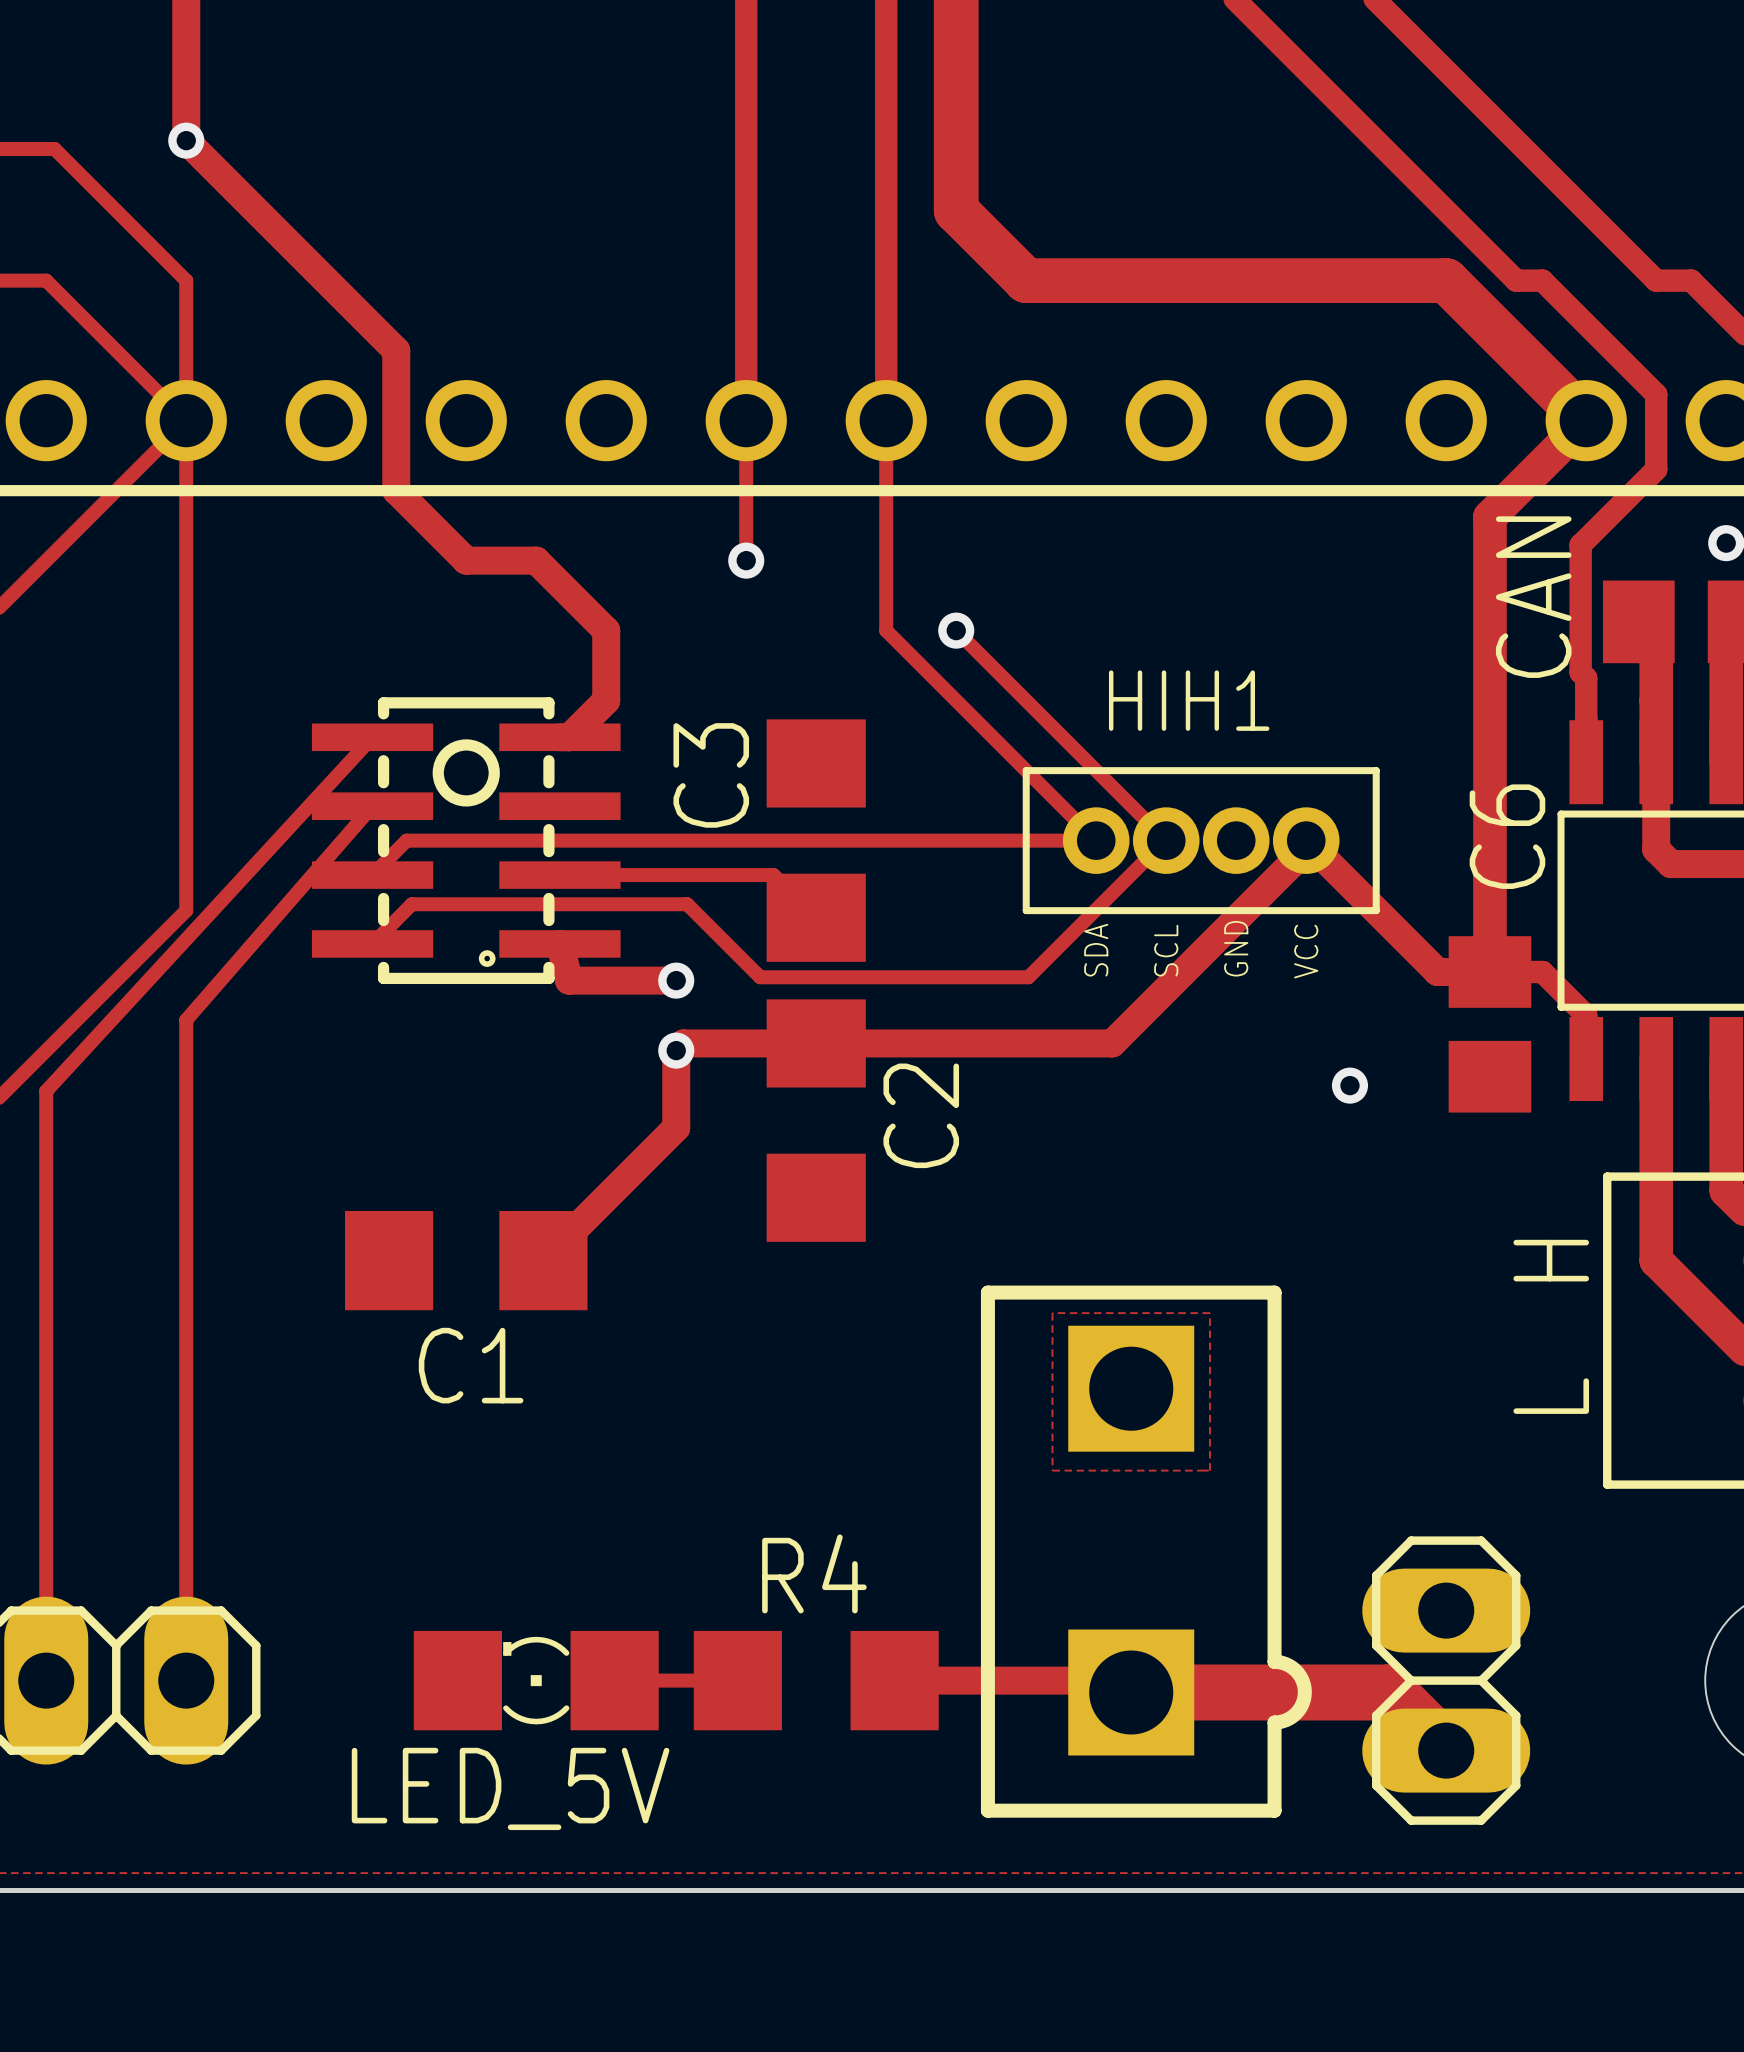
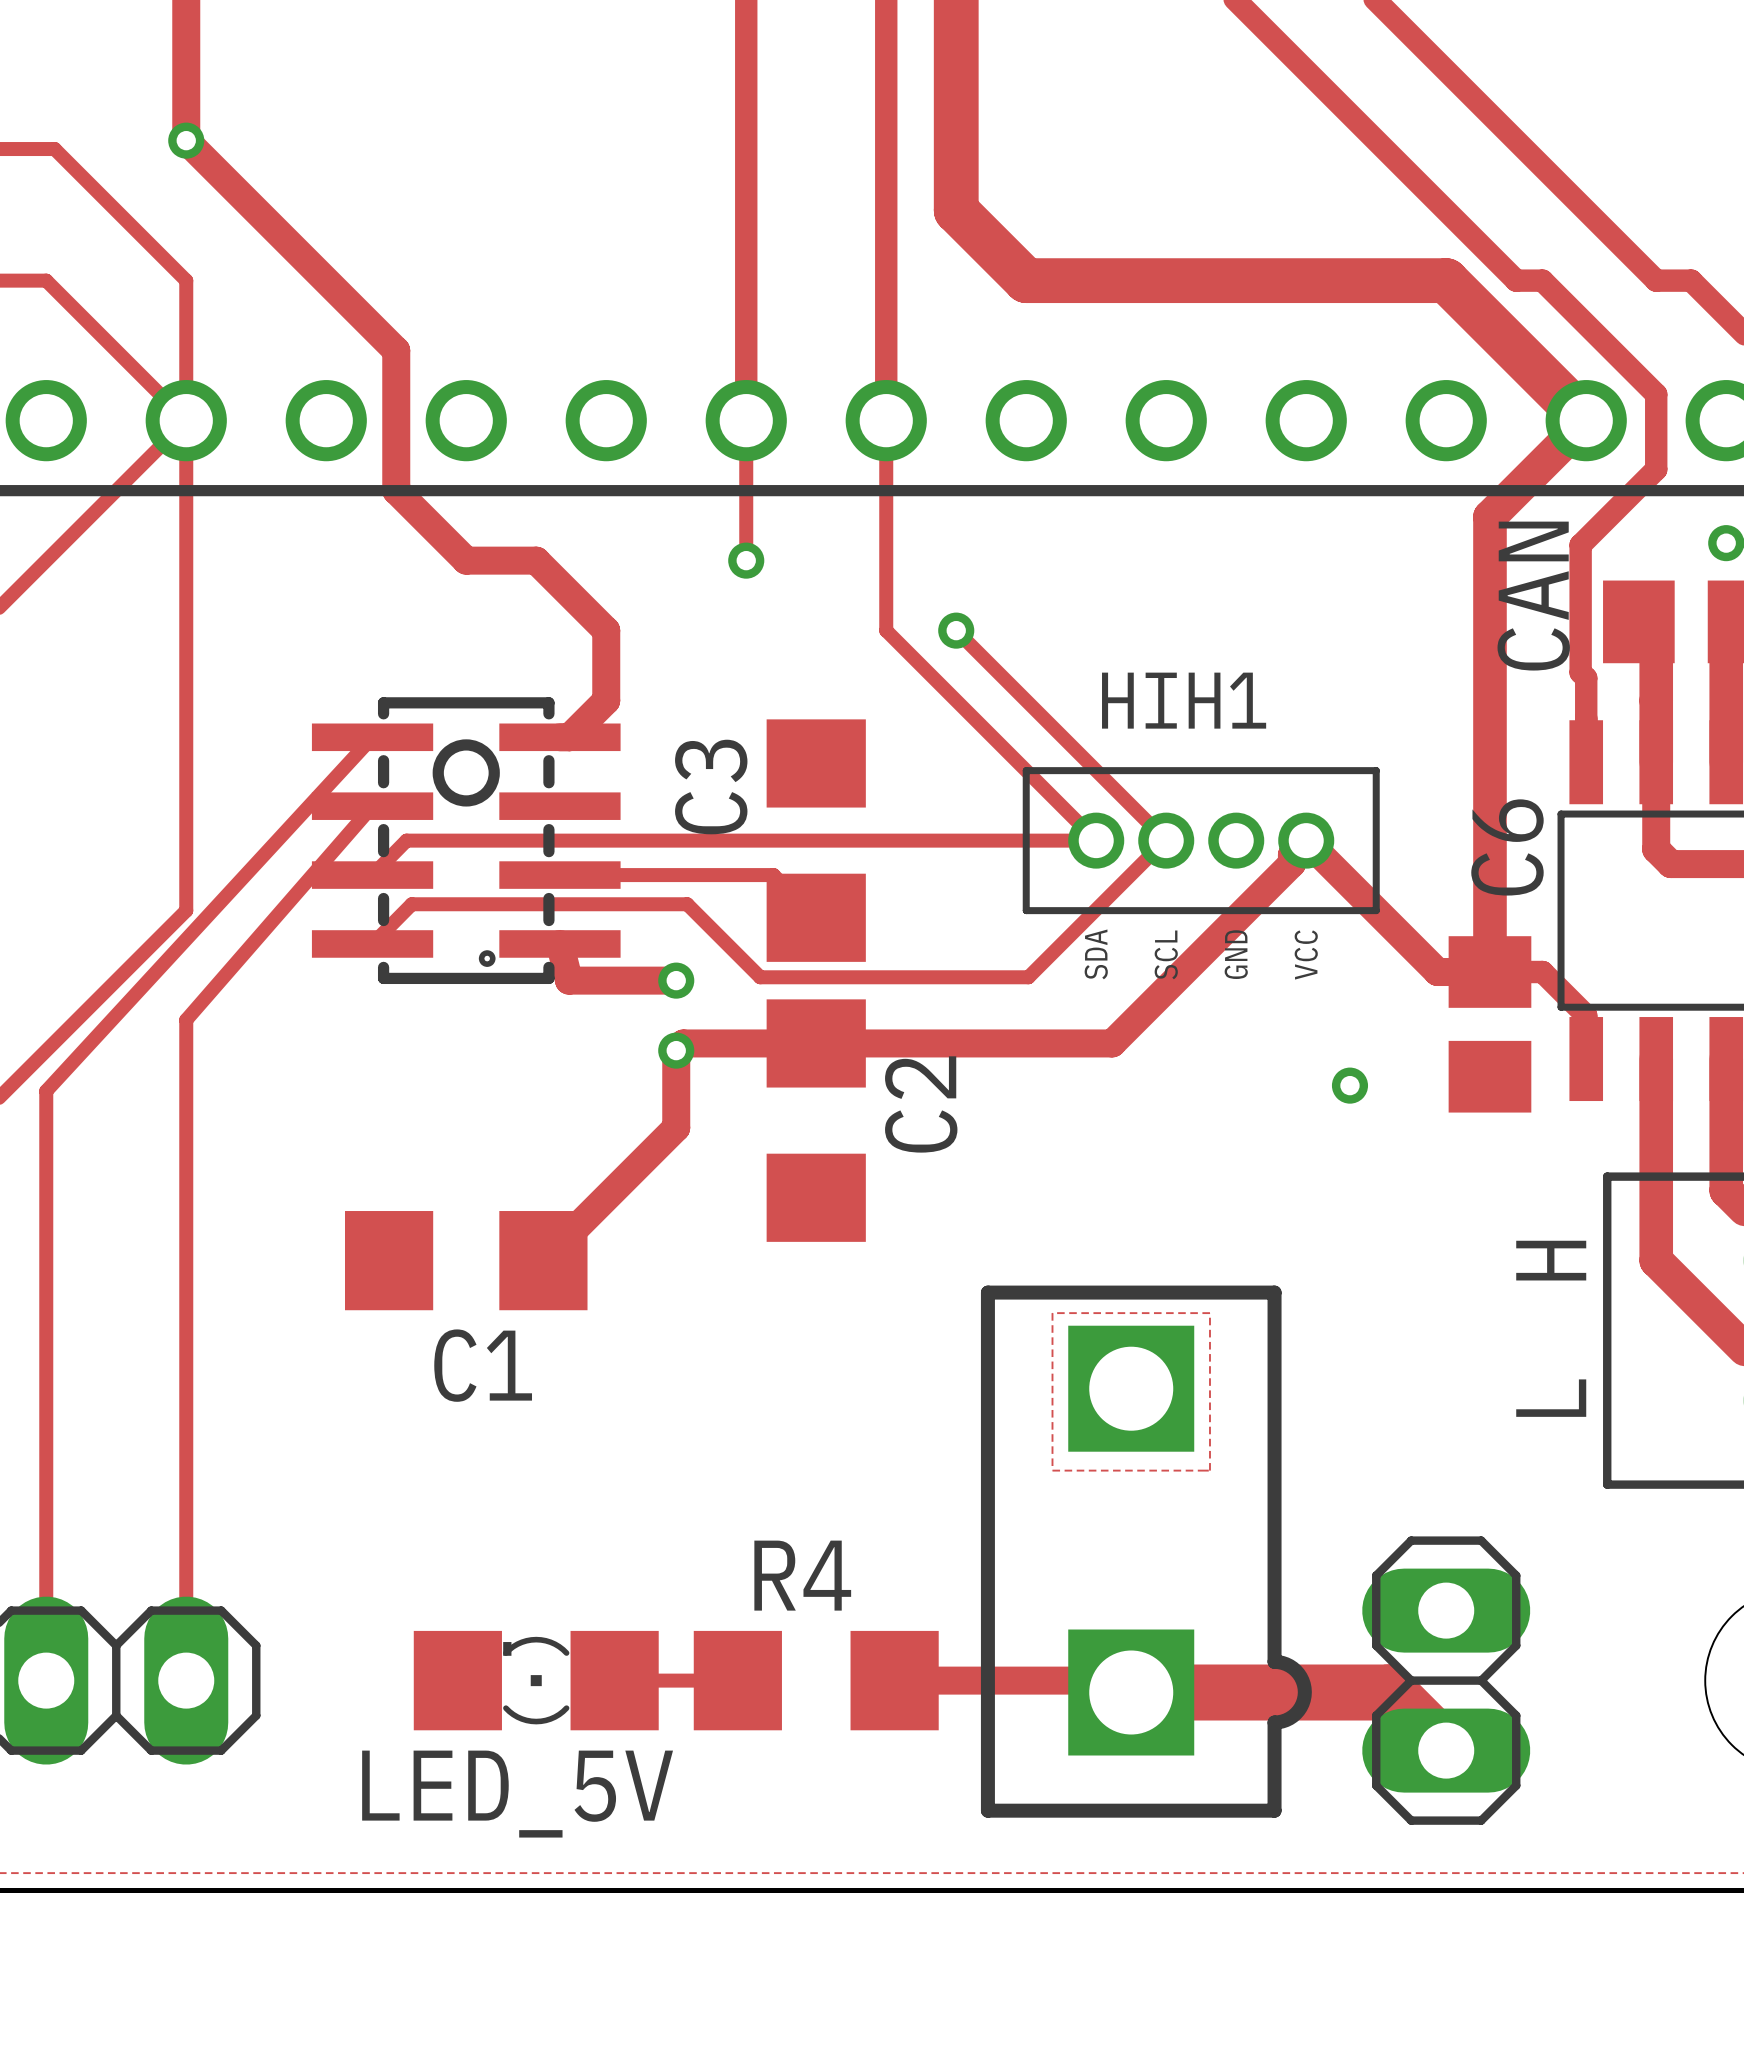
HIH1 footprint: [1022, 767, 1380, 915] -> [1022, 767, 1380, 915]

